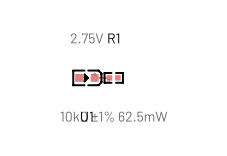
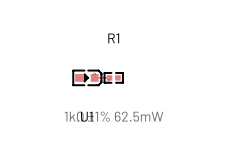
U1 value: 2.75V (87, 38) -> none
R1 value: 10kΩ ±1% 62.5mW (113, 116) -> 1kΩ ±1% 62.5mW (113, 116)

